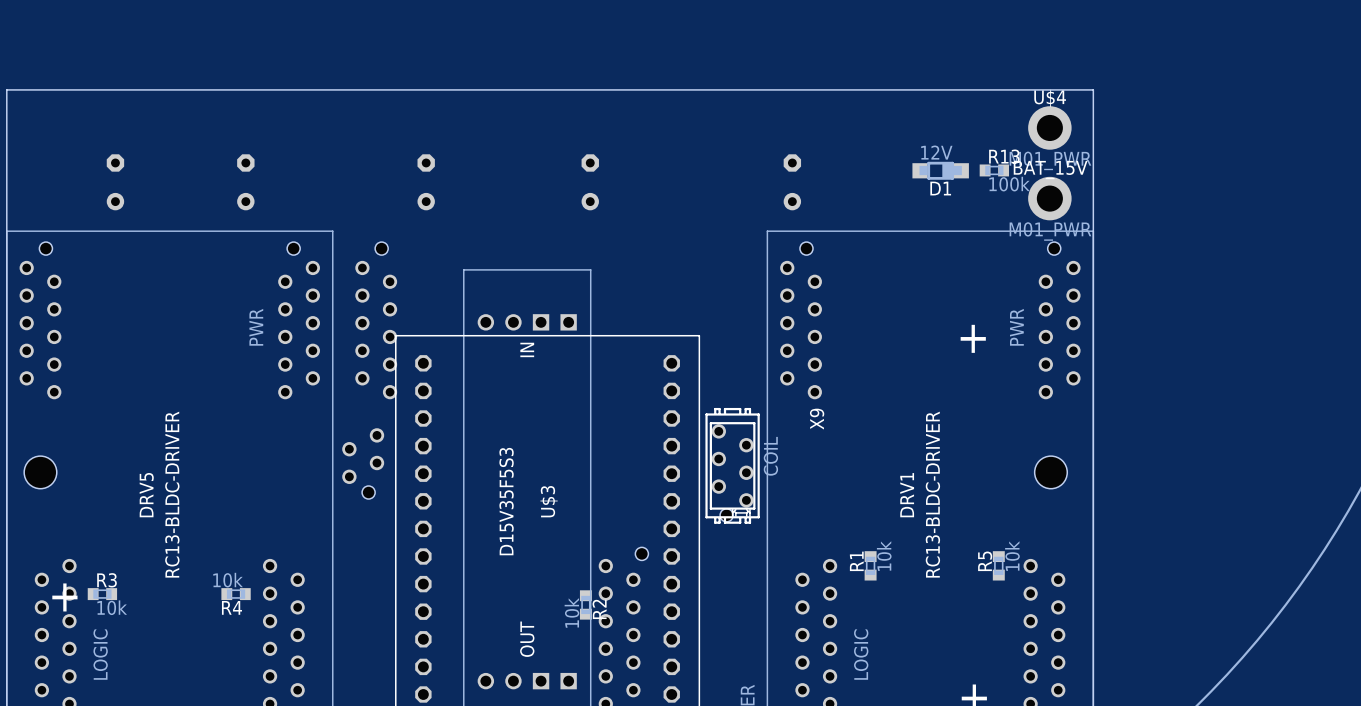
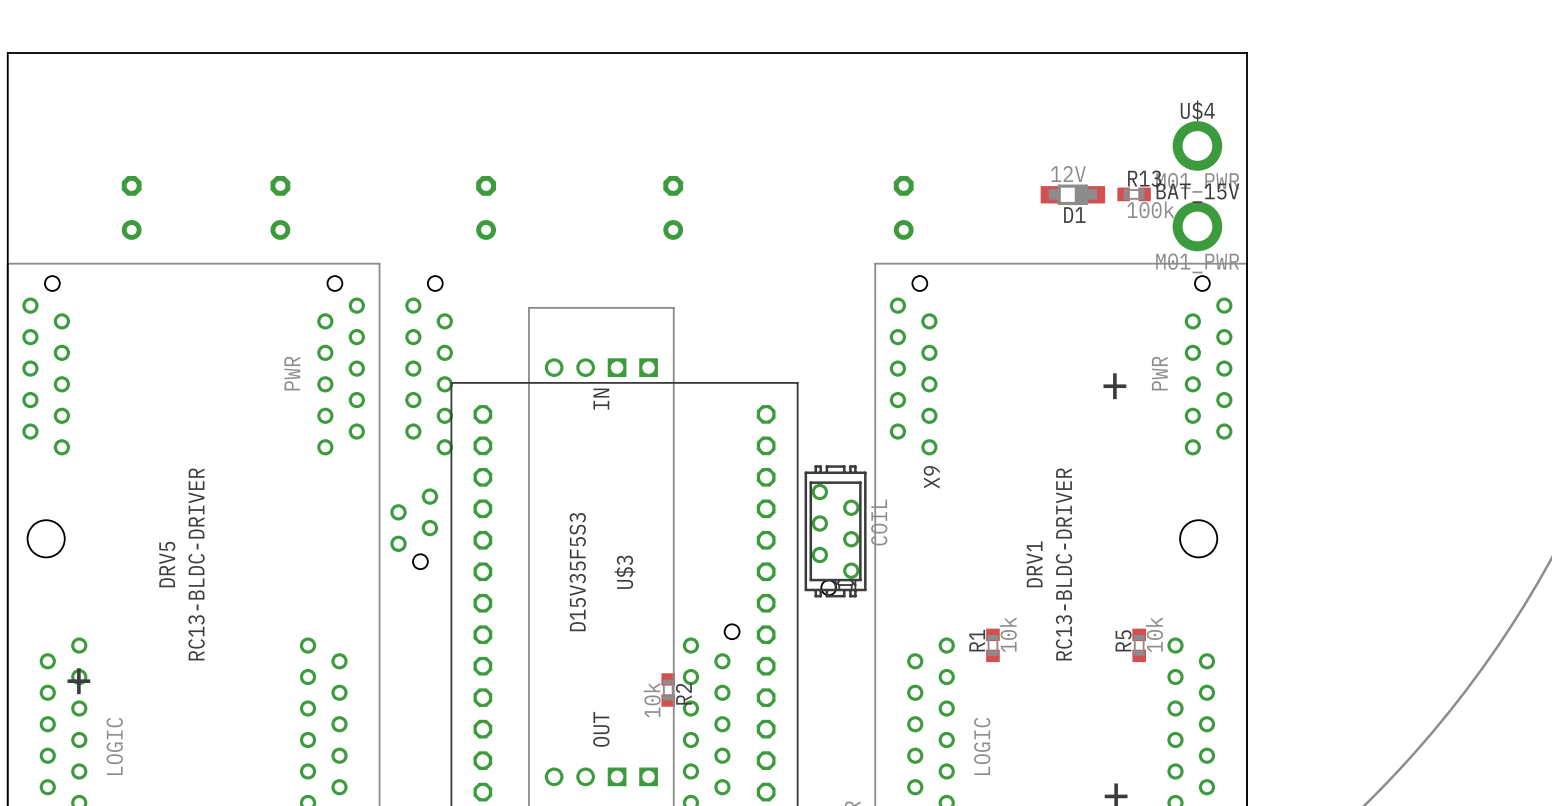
board edge: (6, 89) (1093, 89) -> (7, 102) (7, 53) (1247, 53) (1247, 102)
R3: 10k (102, 594) -> none
R4: 10k (236, 594) -> none

